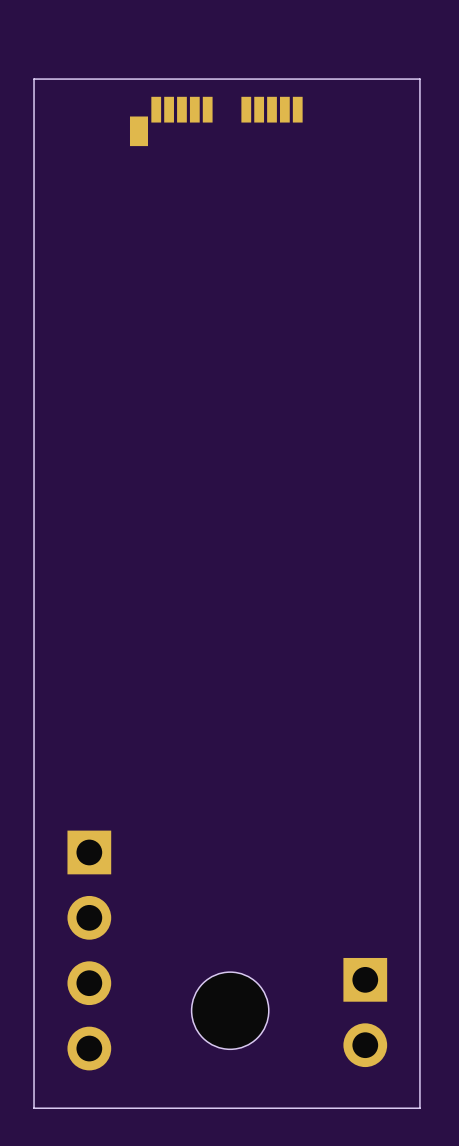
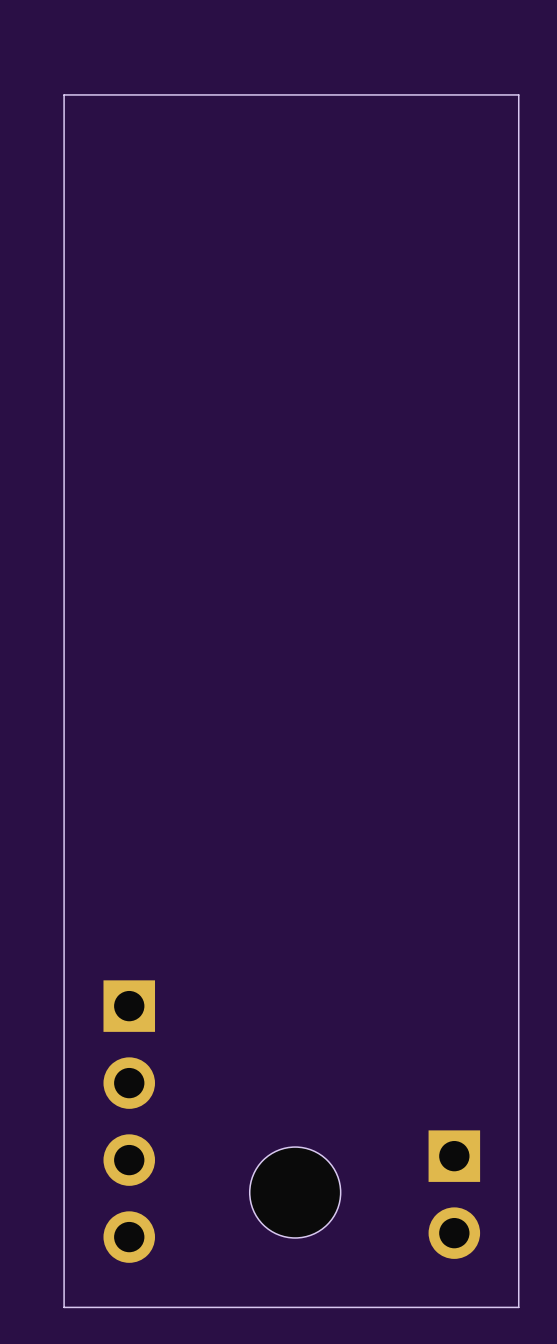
part: (216, 121) -> none

